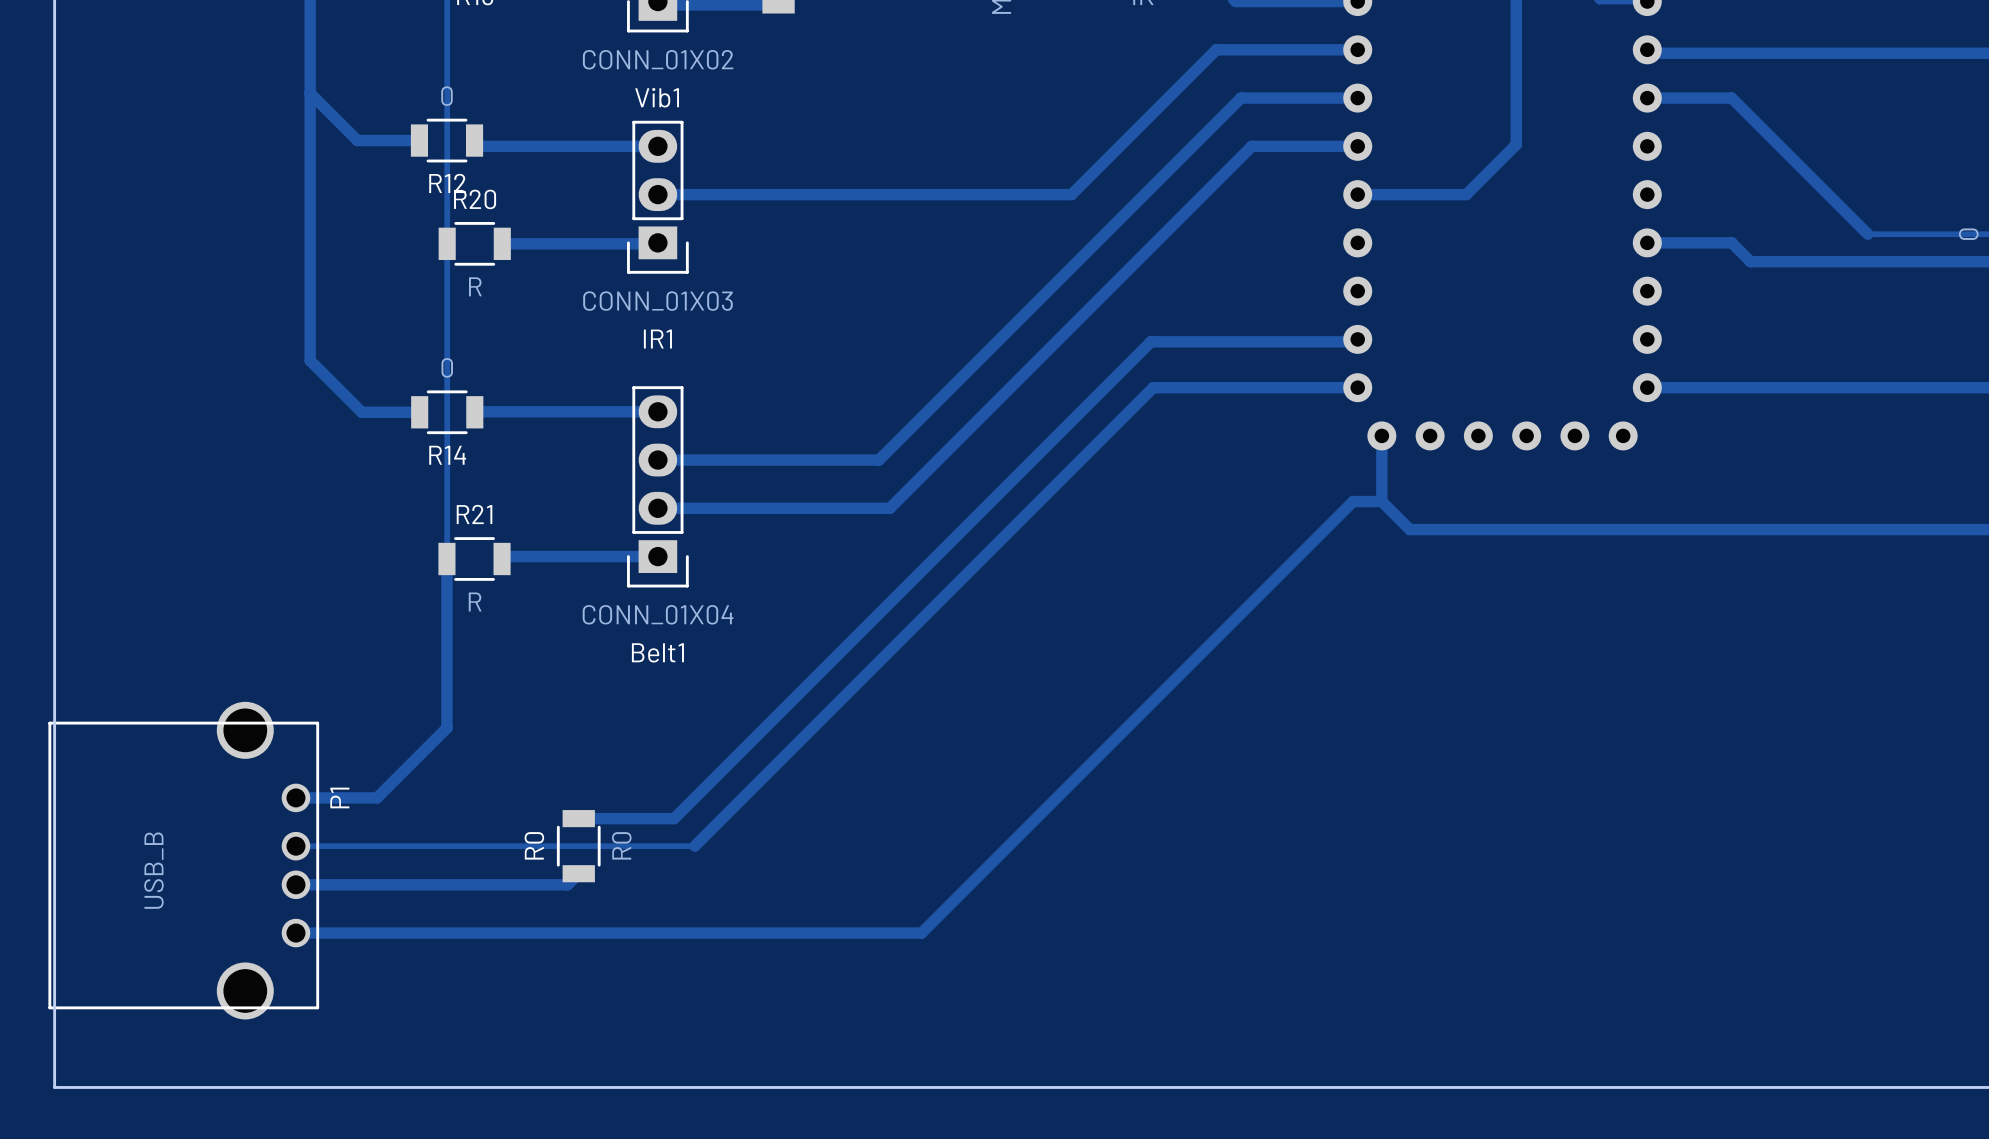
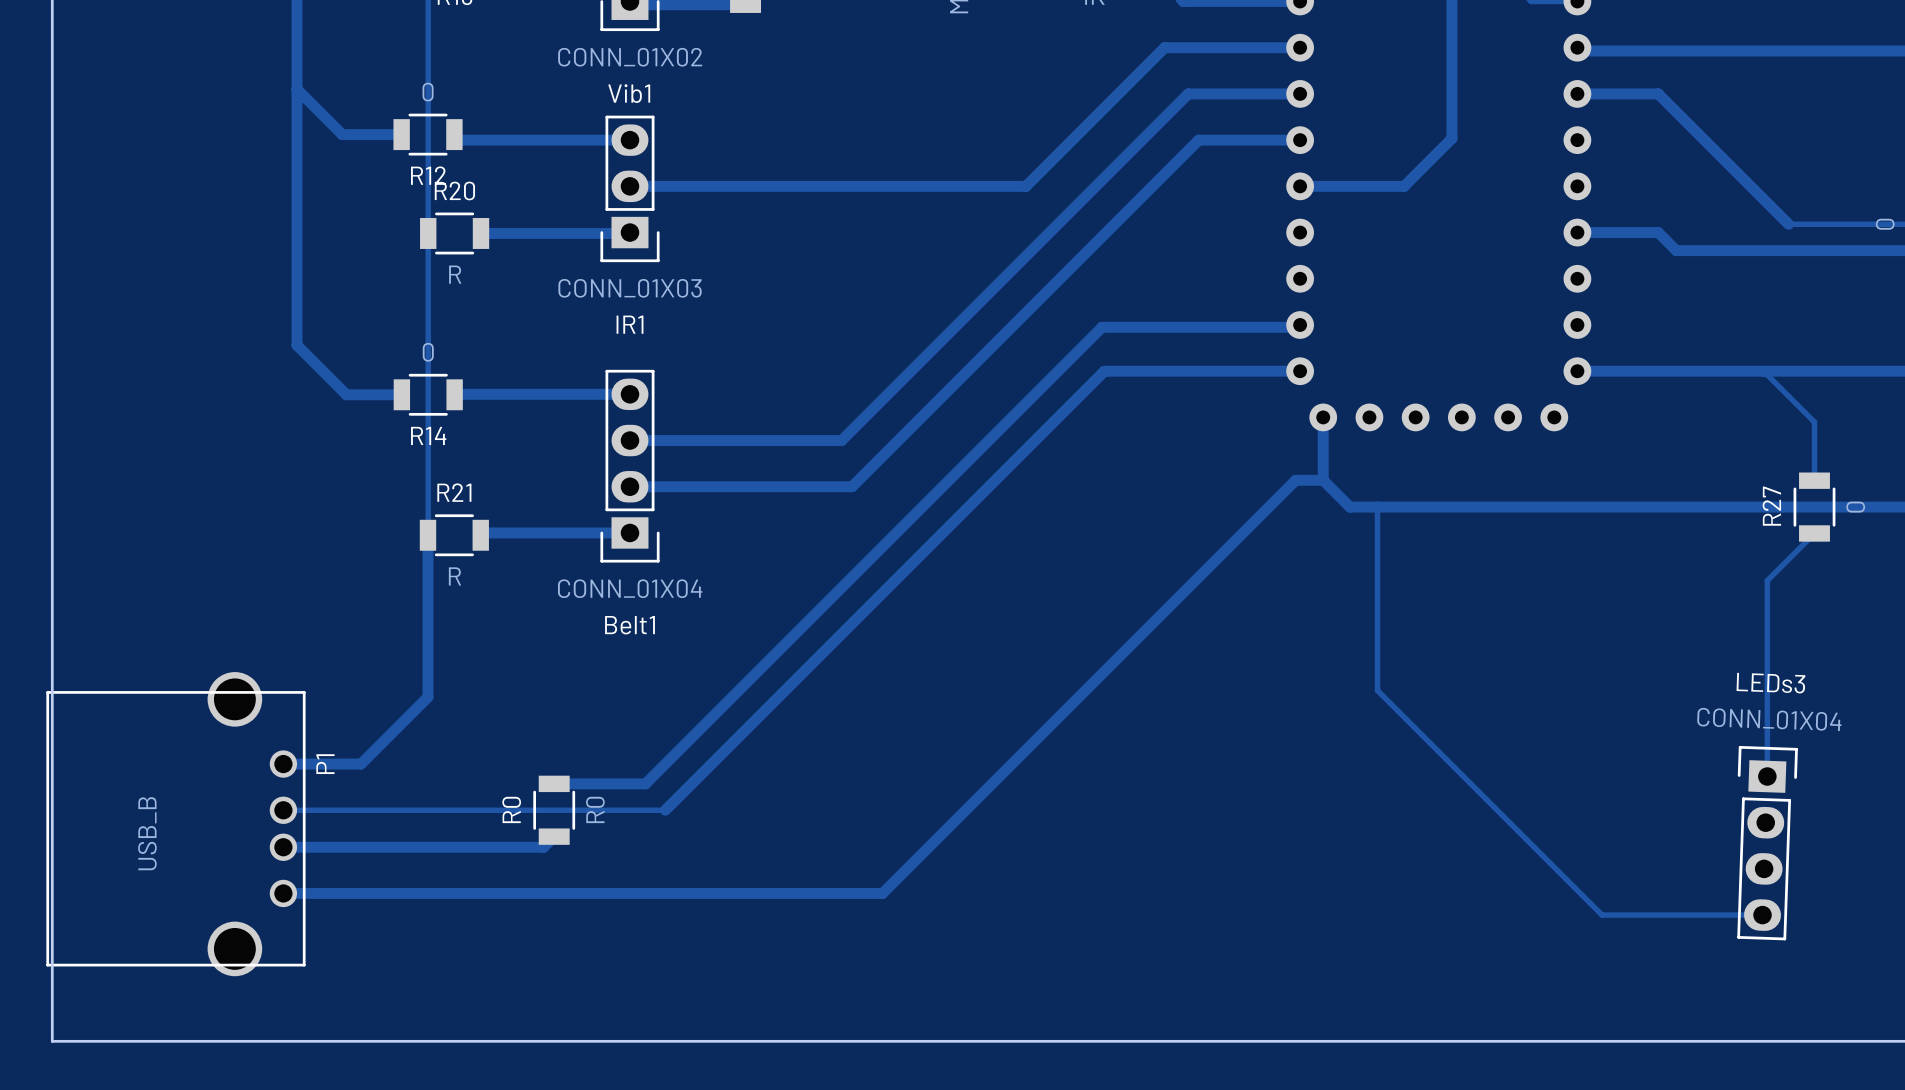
track: none -> (1763, 371) (1814, 422) (1814, 480)
track: none -> (1377, 507) (1377, 690) (1602, 915) (1762, 915)
R27: none -> 0 (1814, 507)
track: none -> (1814, 533) (1767, 580) (1767, 776)
LEDs3: none -> CONN_01X04 (1767, 843)

